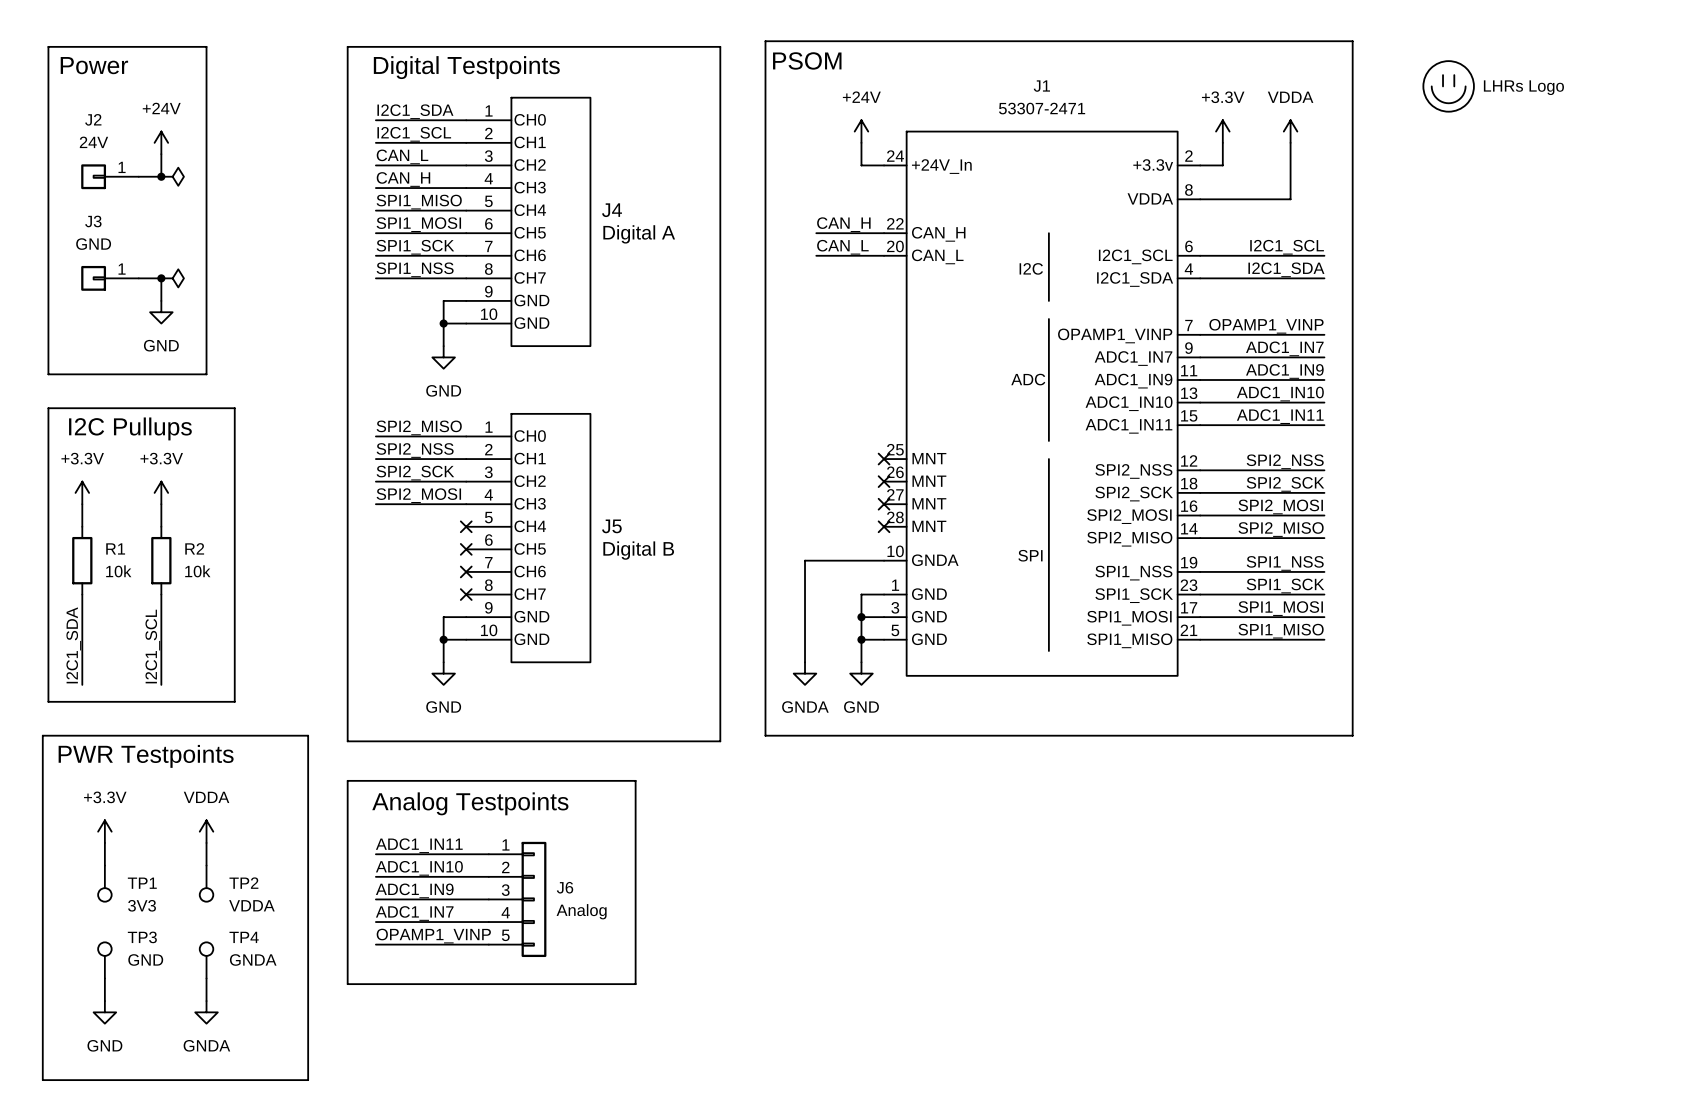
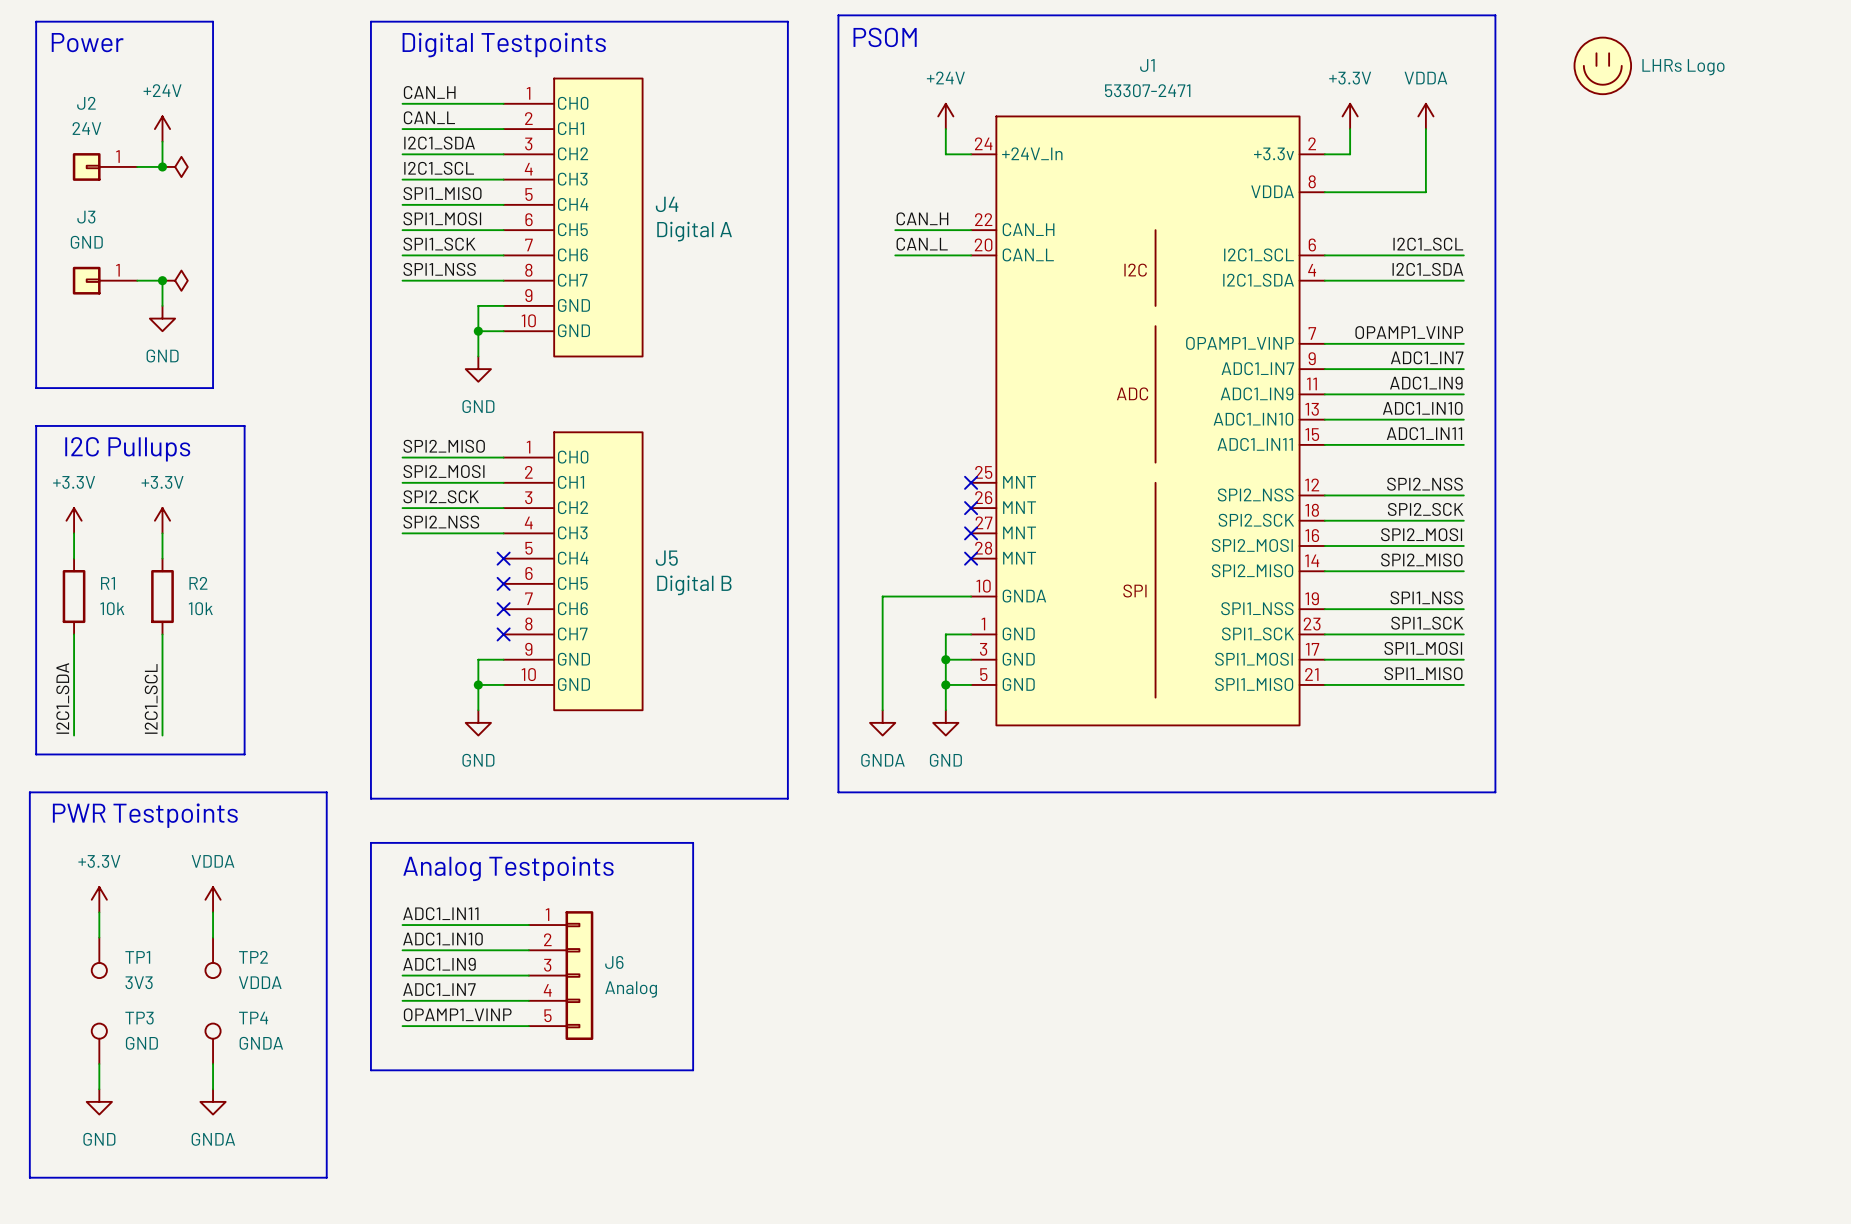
label: I2C1_SDA (415, 111) -> CAN_H (429, 92)
label: I2C1_SCL (414, 134) -> CAN_L (429, 117)
label: CAN_L (402, 156) -> I2C1_SDA (439, 143)
label: CAN_H (403, 179) -> I2C1_SCL (439, 168)
label: SPI2_NSS (415, 450) -> SPI2_MOSI (443, 471)
label: SPI2_MOSI (418, 495) -> SPI2_NSS (441, 522)

